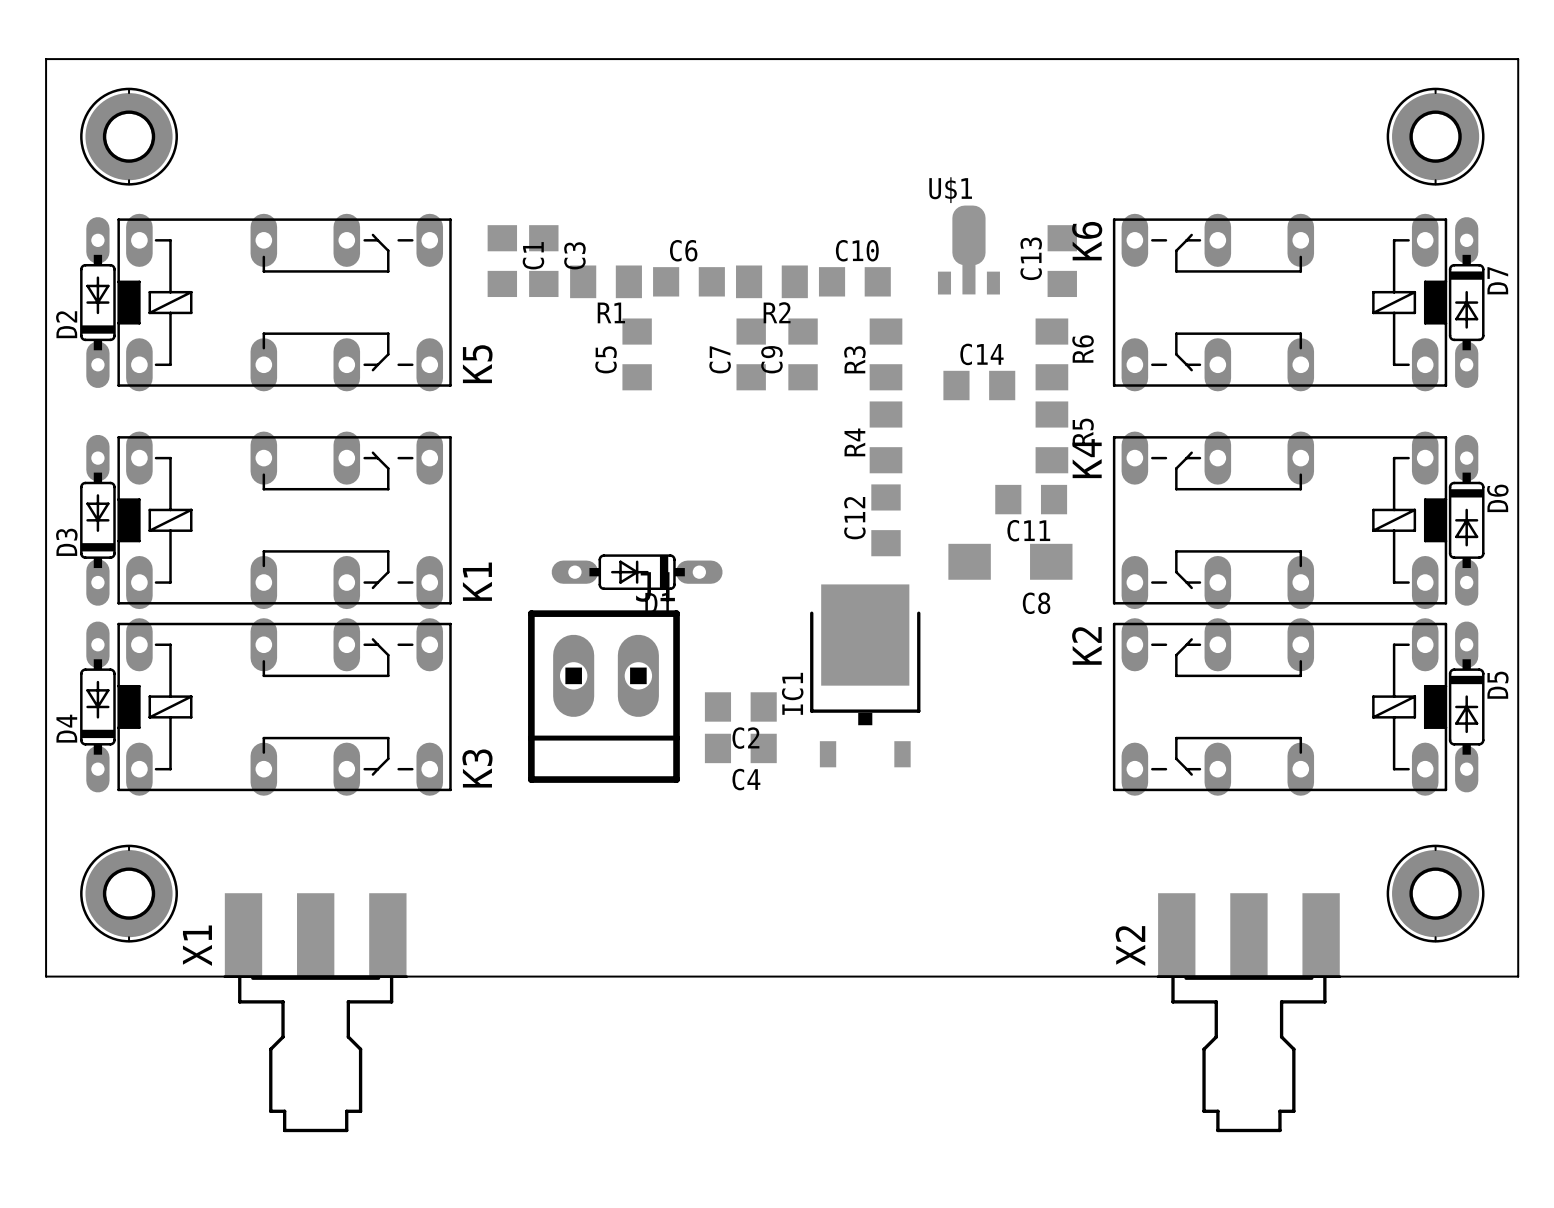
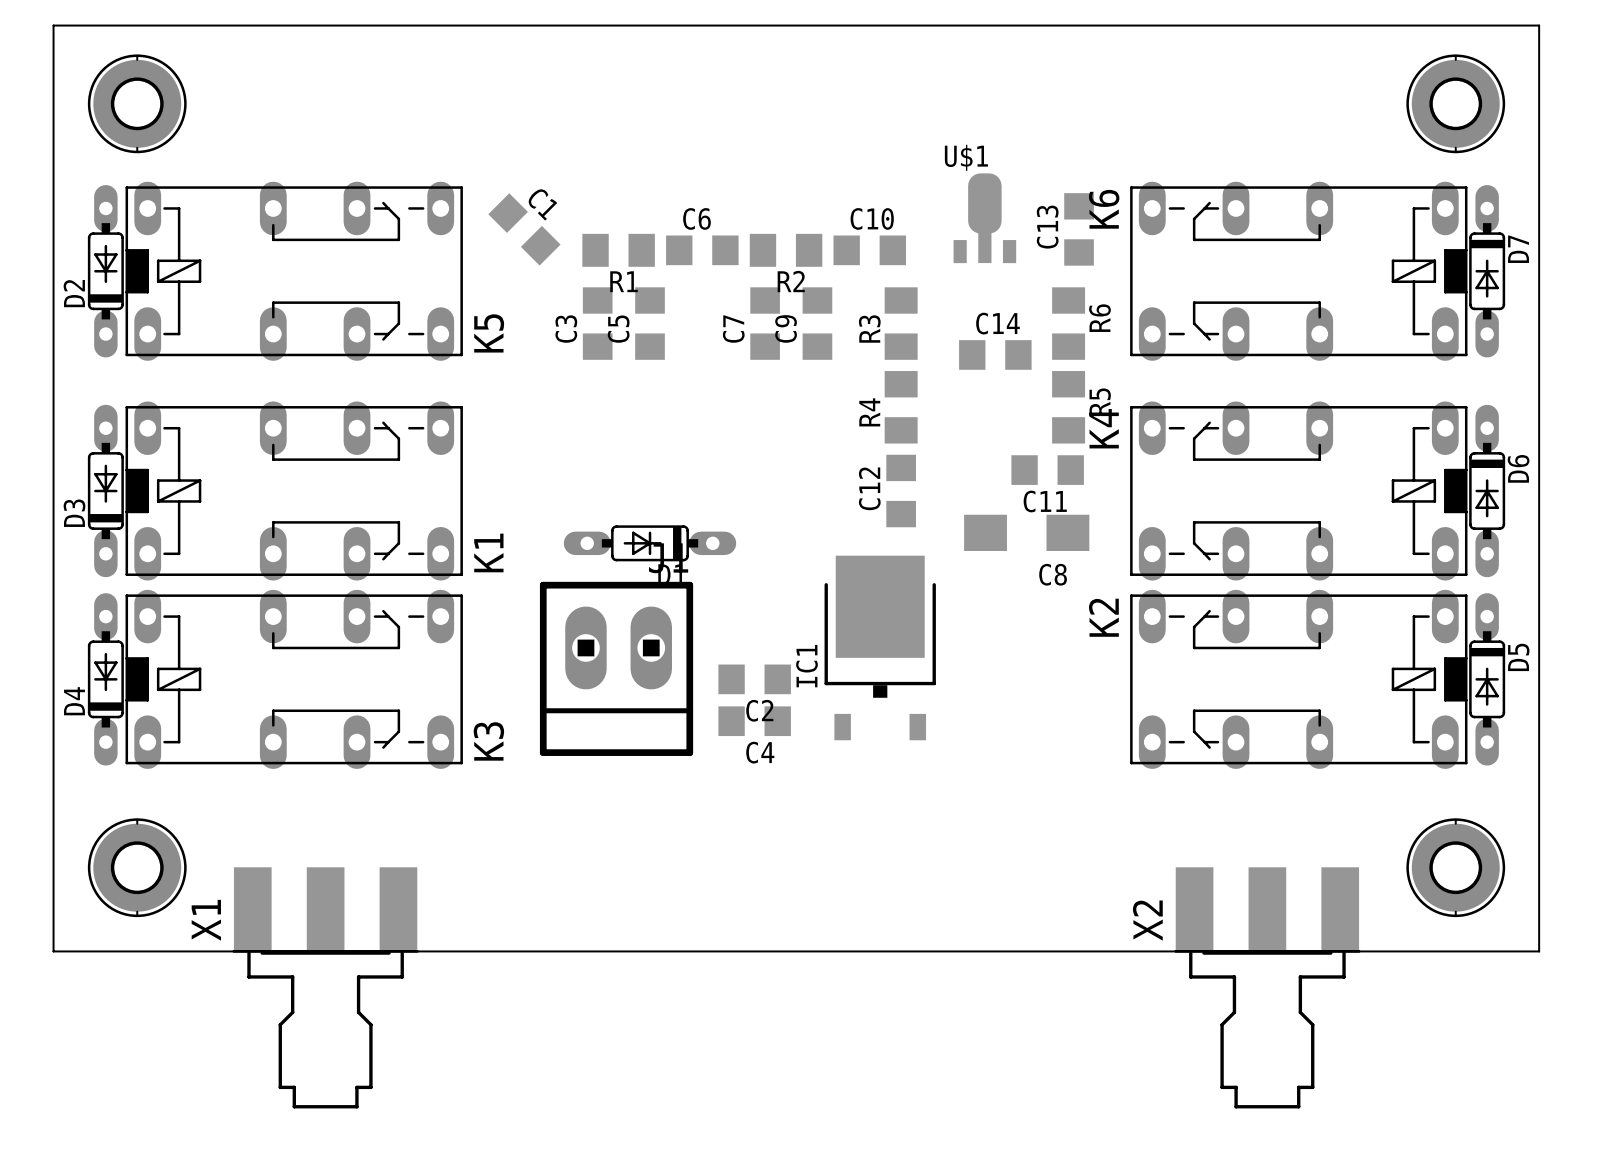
C3 name position: C3 (574, 255) -> C3 (566, 329)
C1 rotation: 0° (502, 261) -> 45° counterclockwise (524, 229)
C3 position: (543, 261) -> (597, 323)

